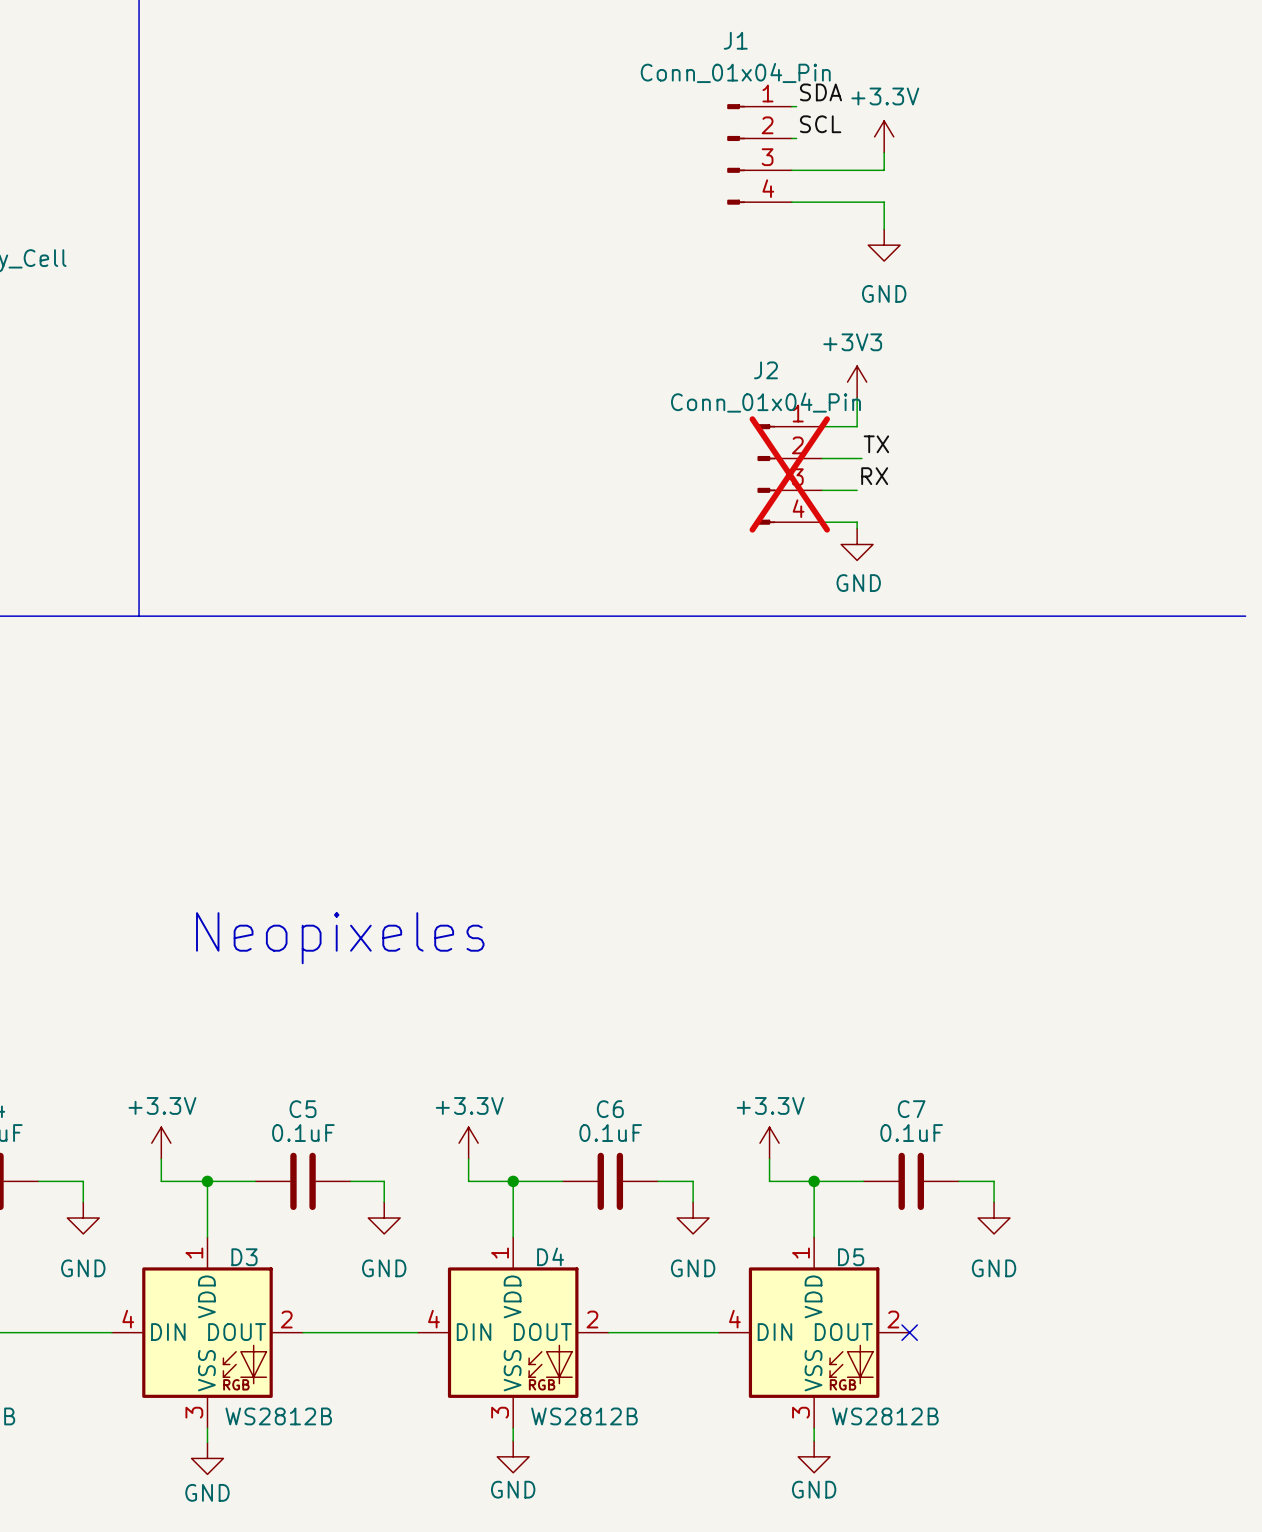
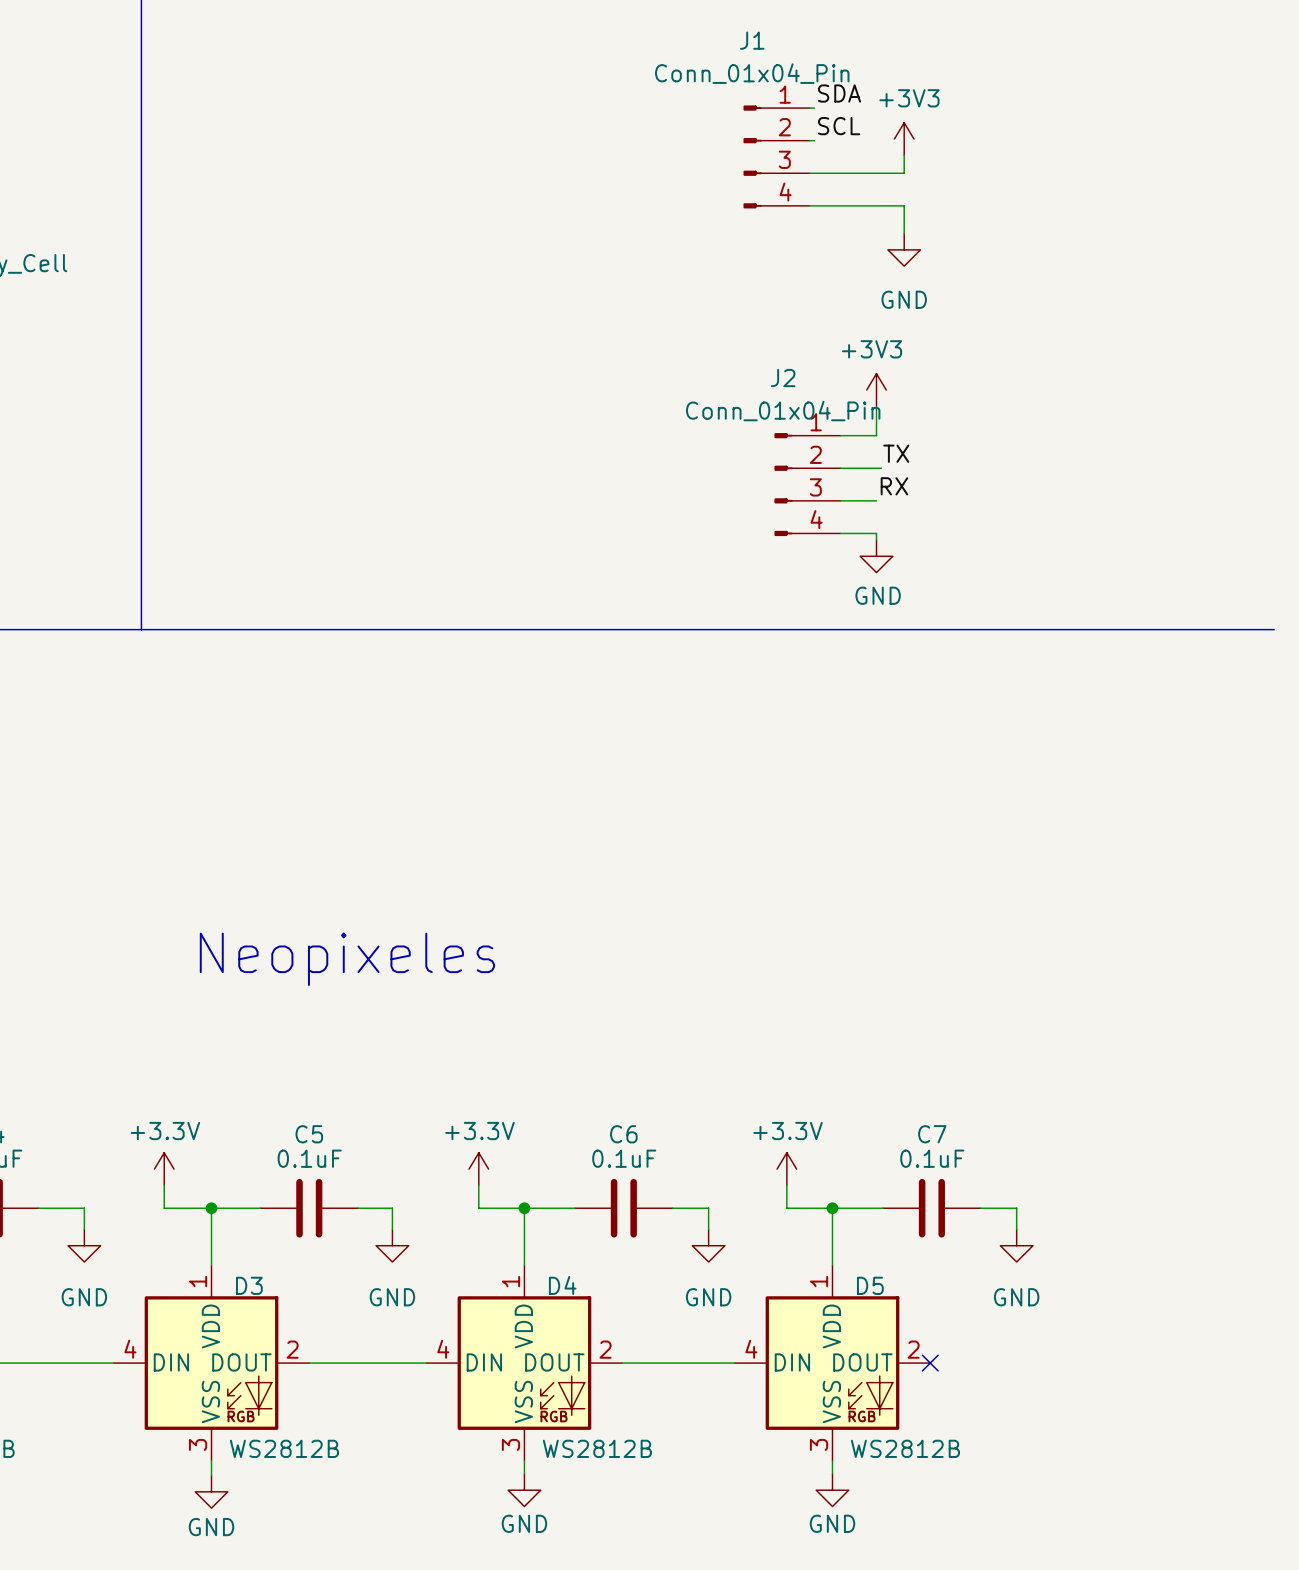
power symbol: +3.3V (884, 136) -> +3V3 (904, 139)
J2 do-not-place cross: (789, 474) -> none

